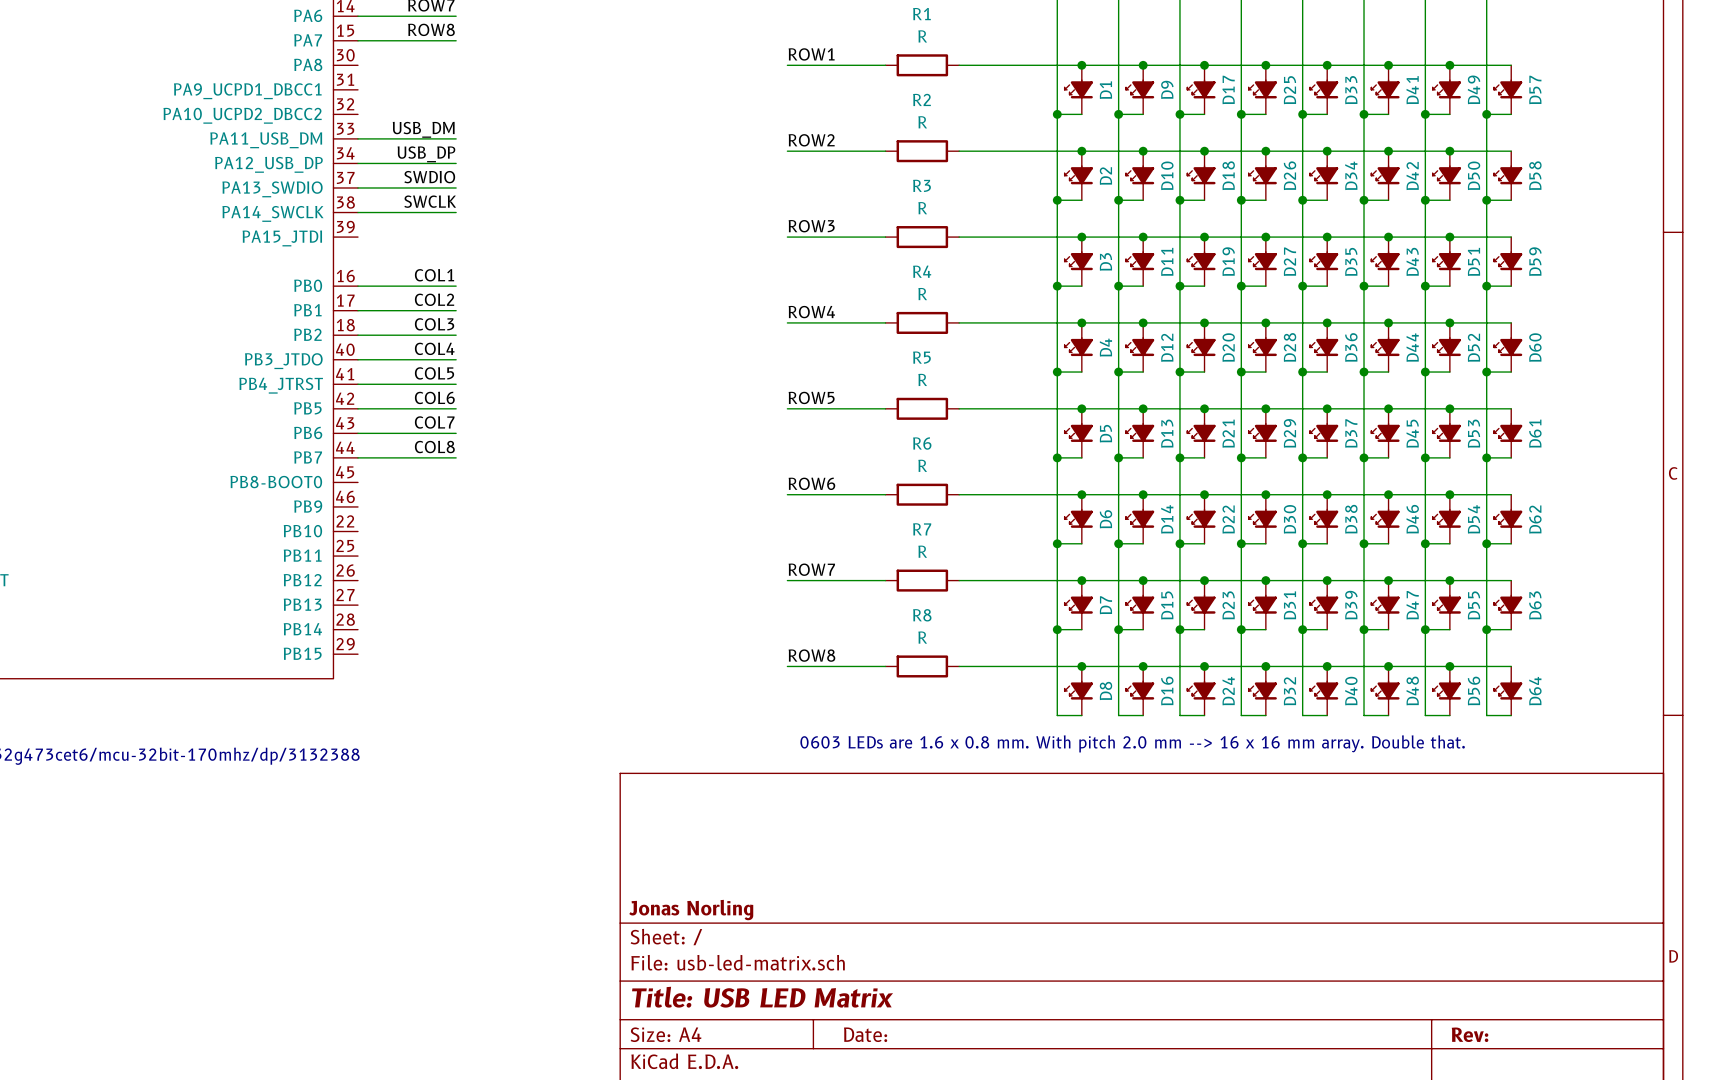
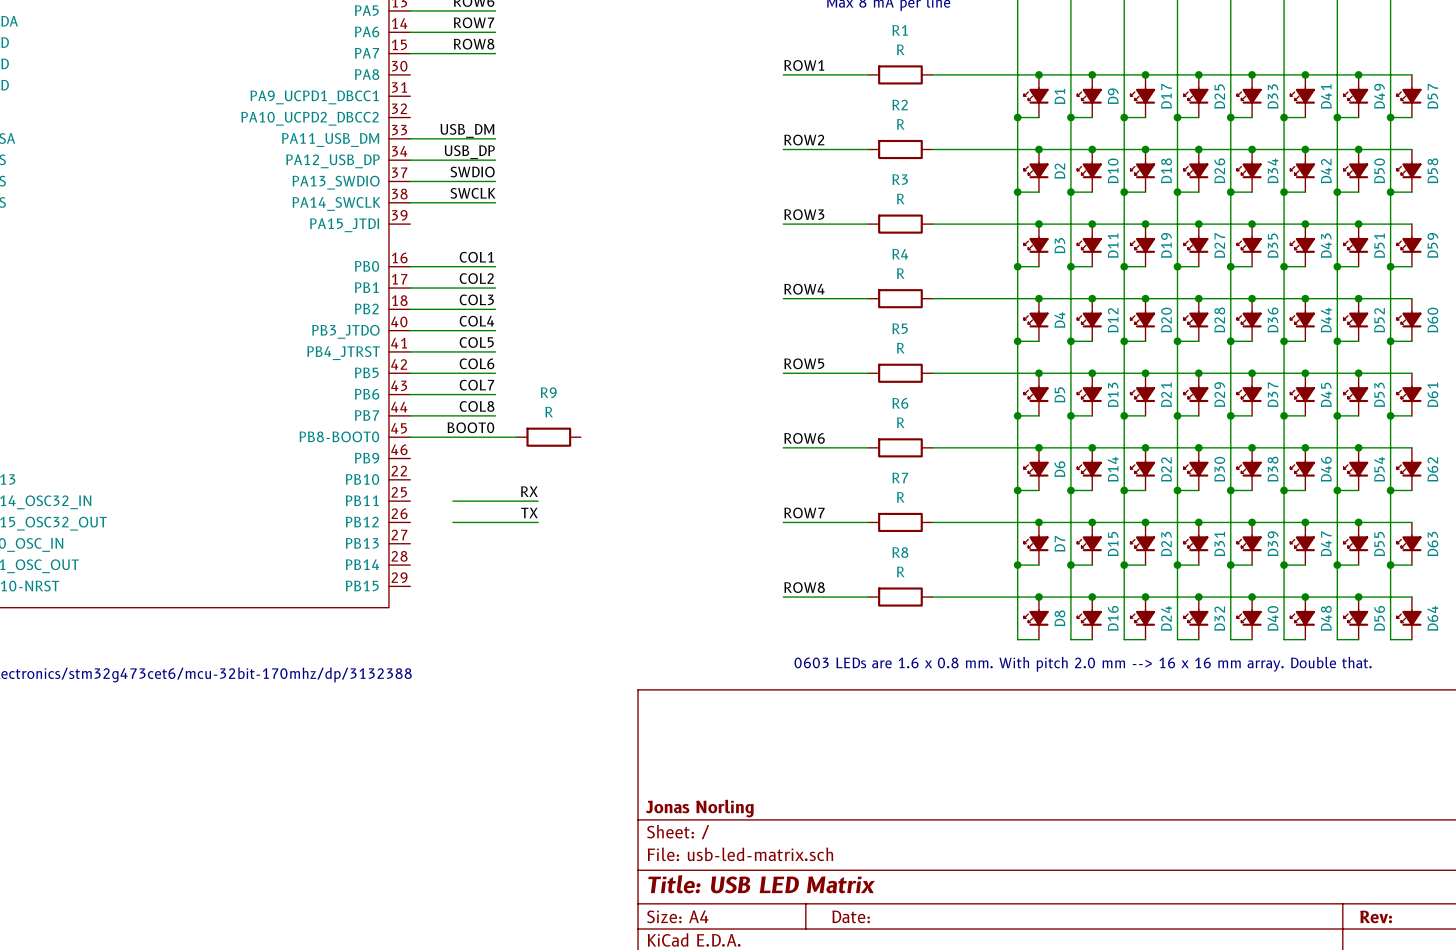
label: none -> BOOT0 (470, 427)
wire: none -> (410, 437) (516, 437)
R9: none -> R (548, 437)
label: none -> RX (529, 491)
wire: none -> (452, 501) (538, 501)
label: none -> TX (529, 512)
wire: none -> (452, 522) (538, 522)

